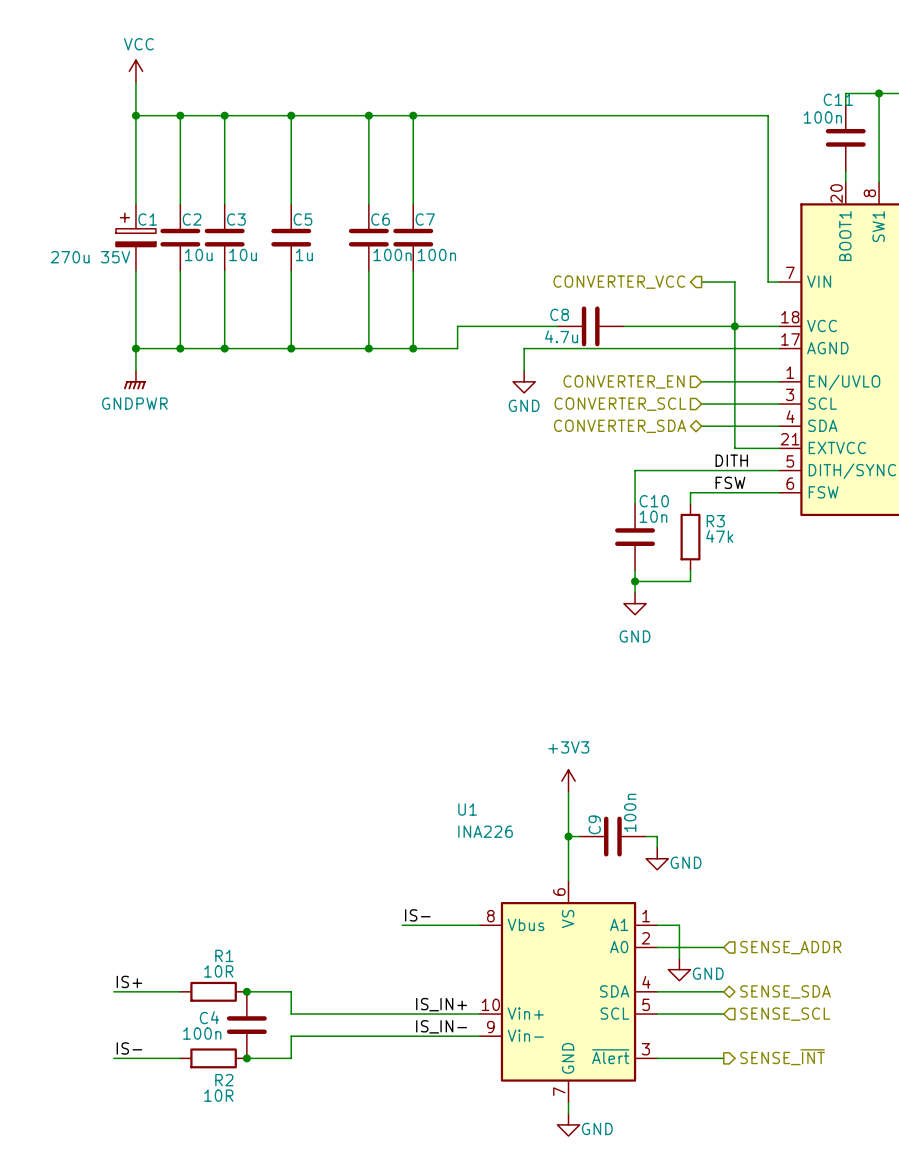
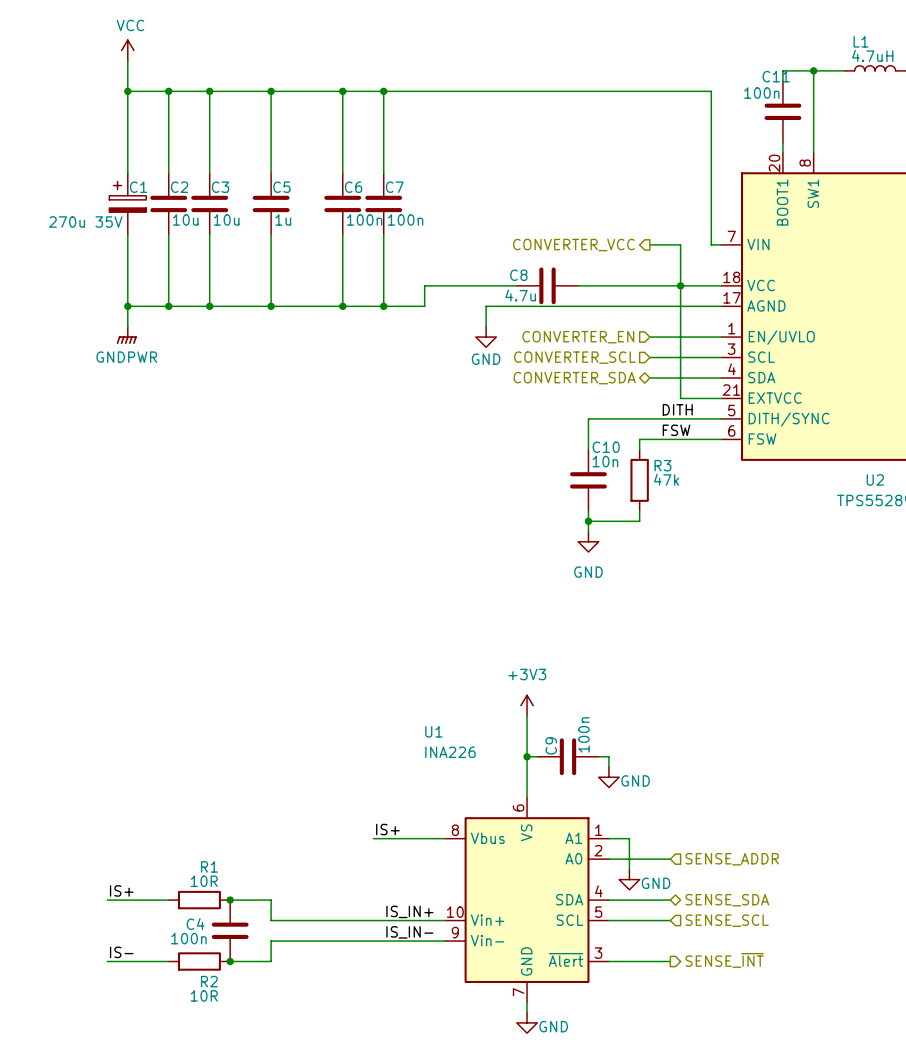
label: IS- (417, 915) -> IS+ (387, 829)

